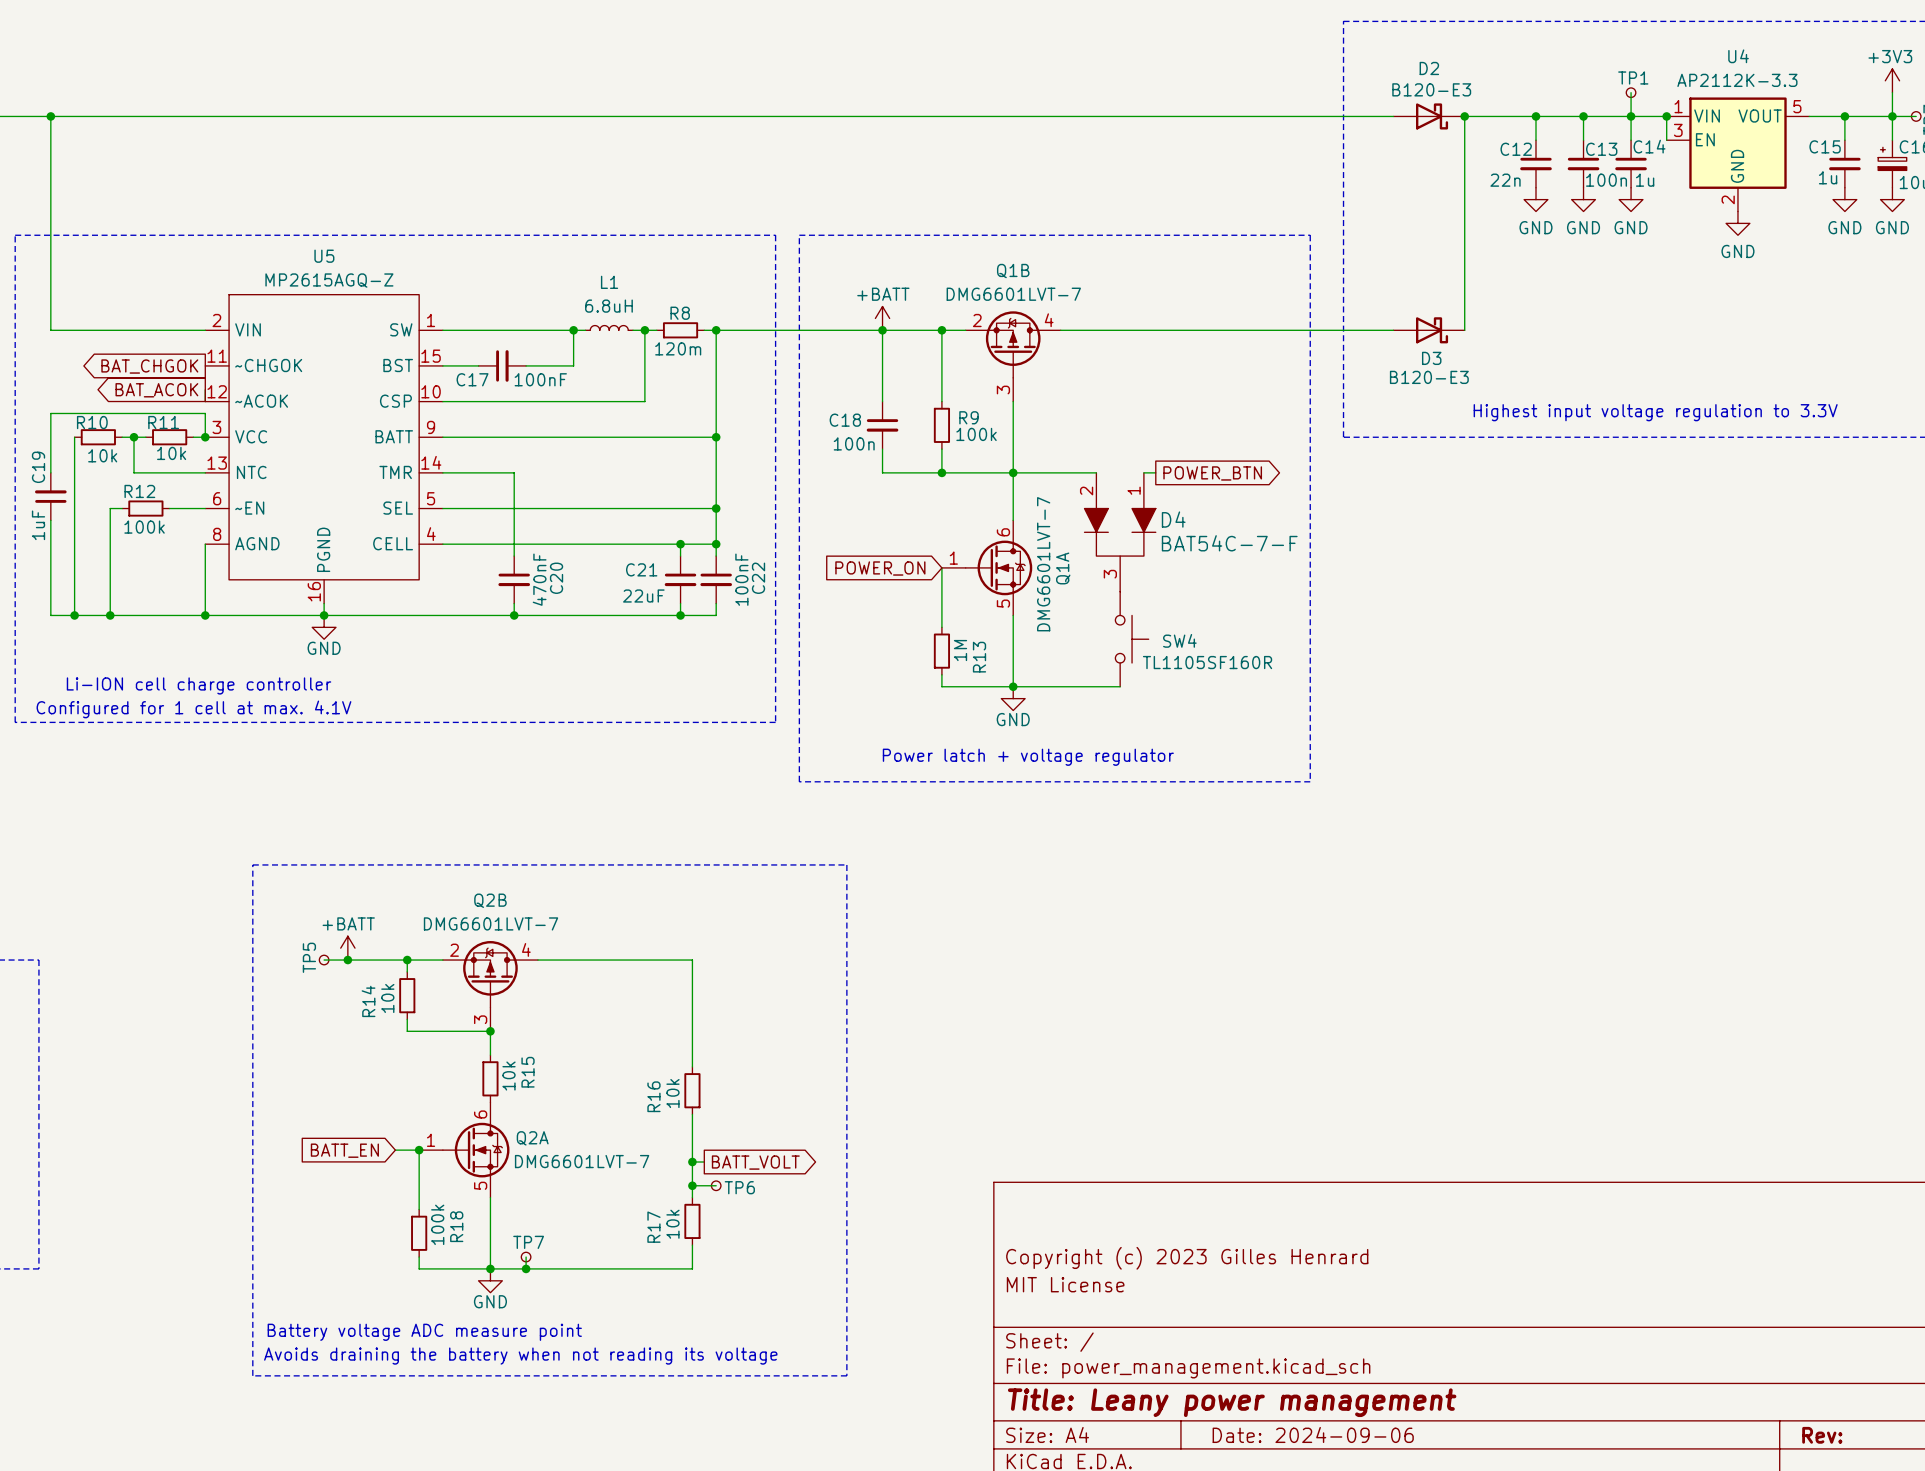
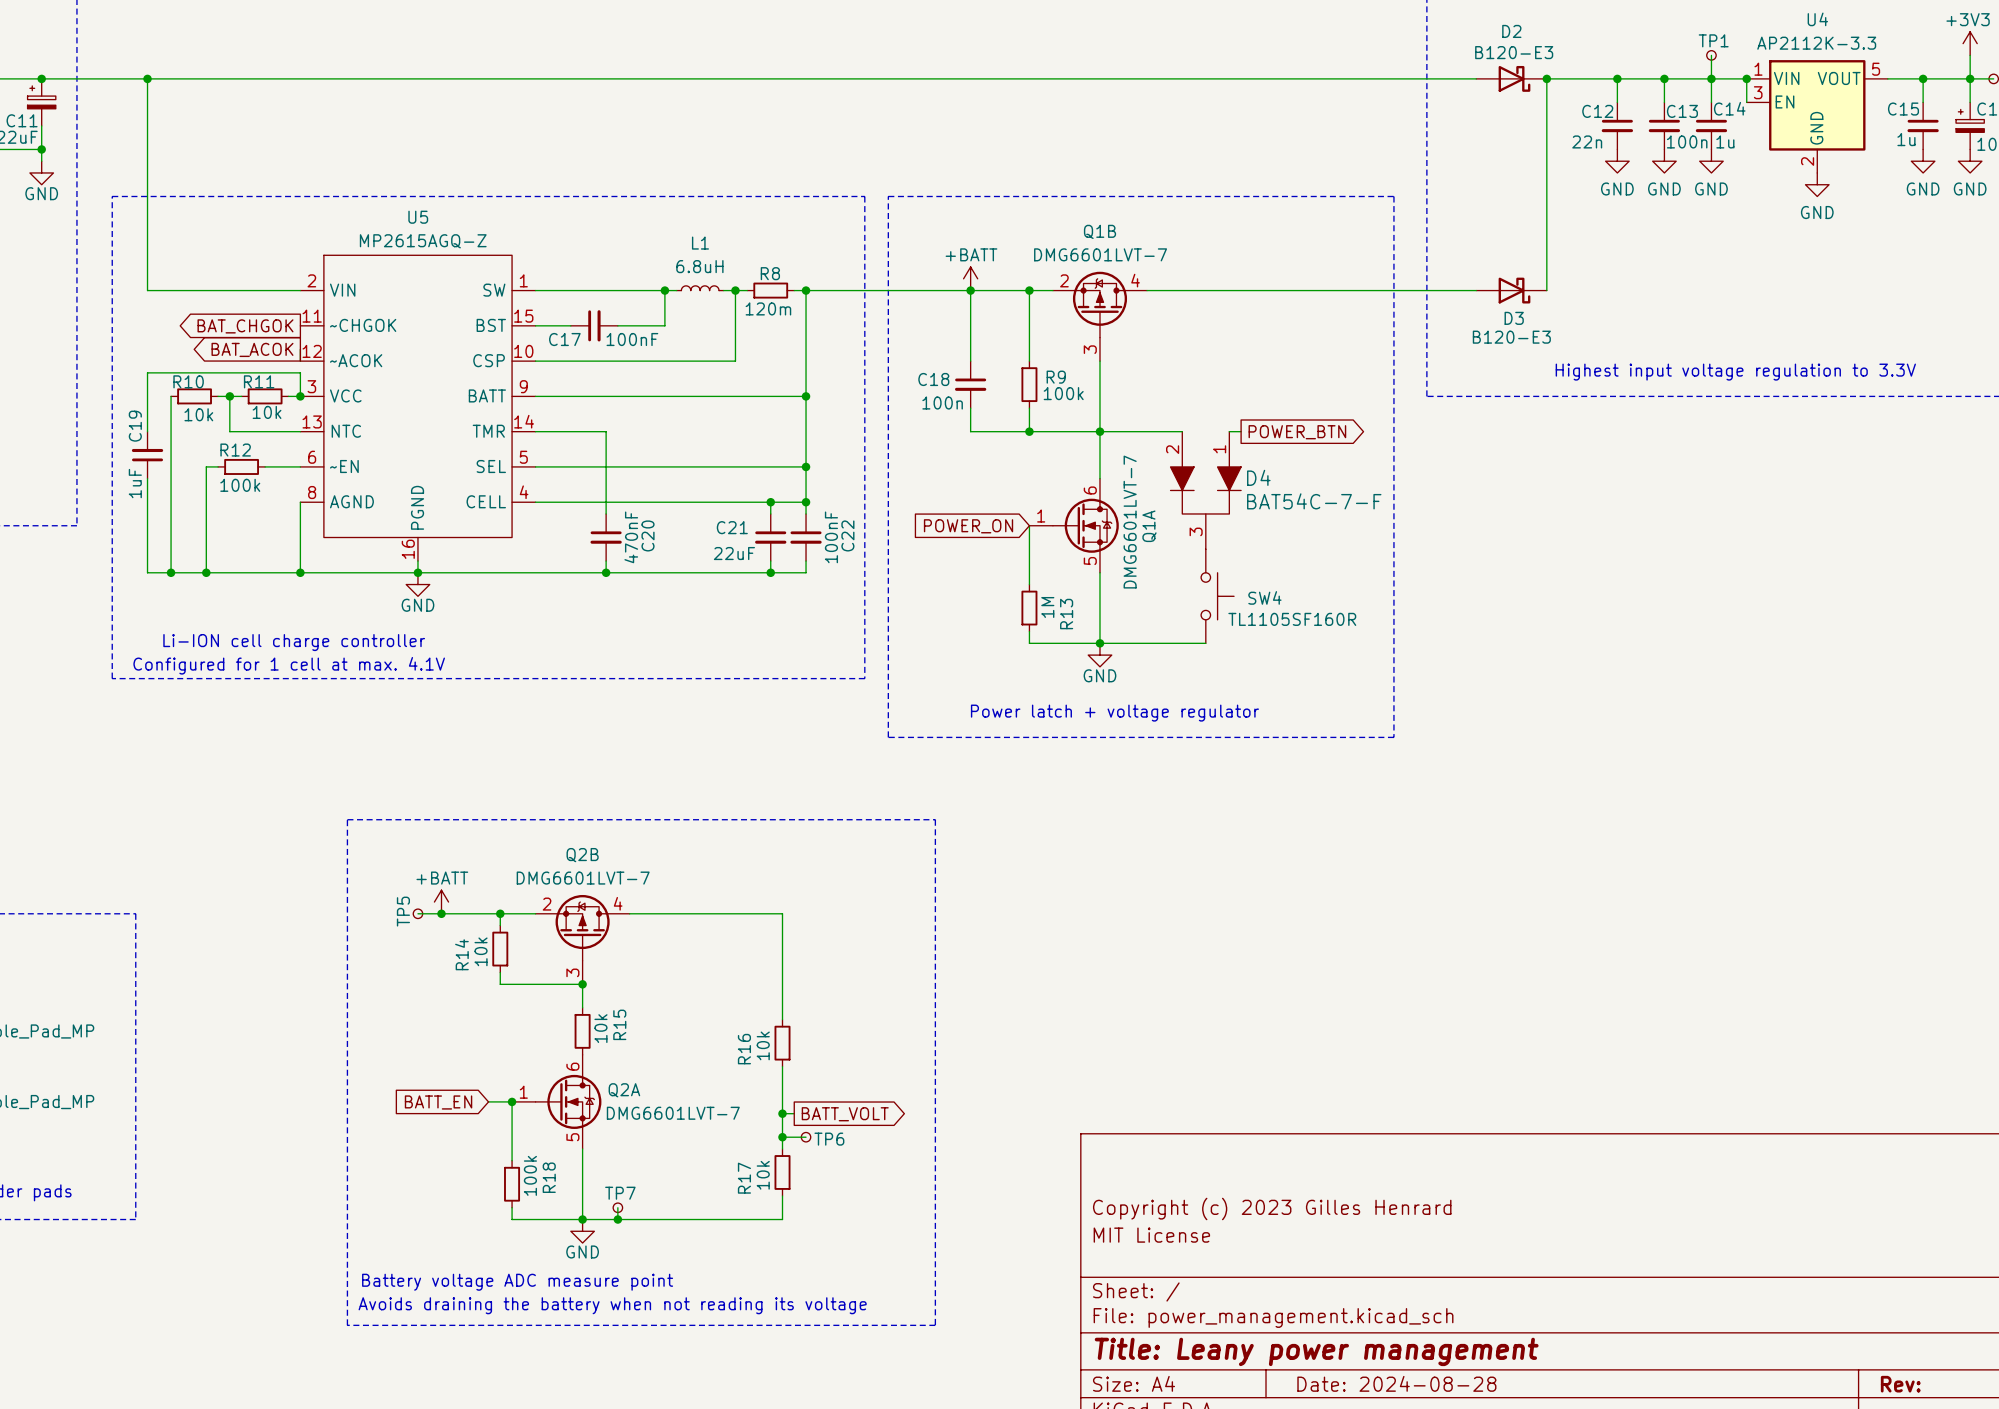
title block: Date: 2024-09-06 (1313, 1434) -> Date: 2024-08-28 (1396, 1383)

